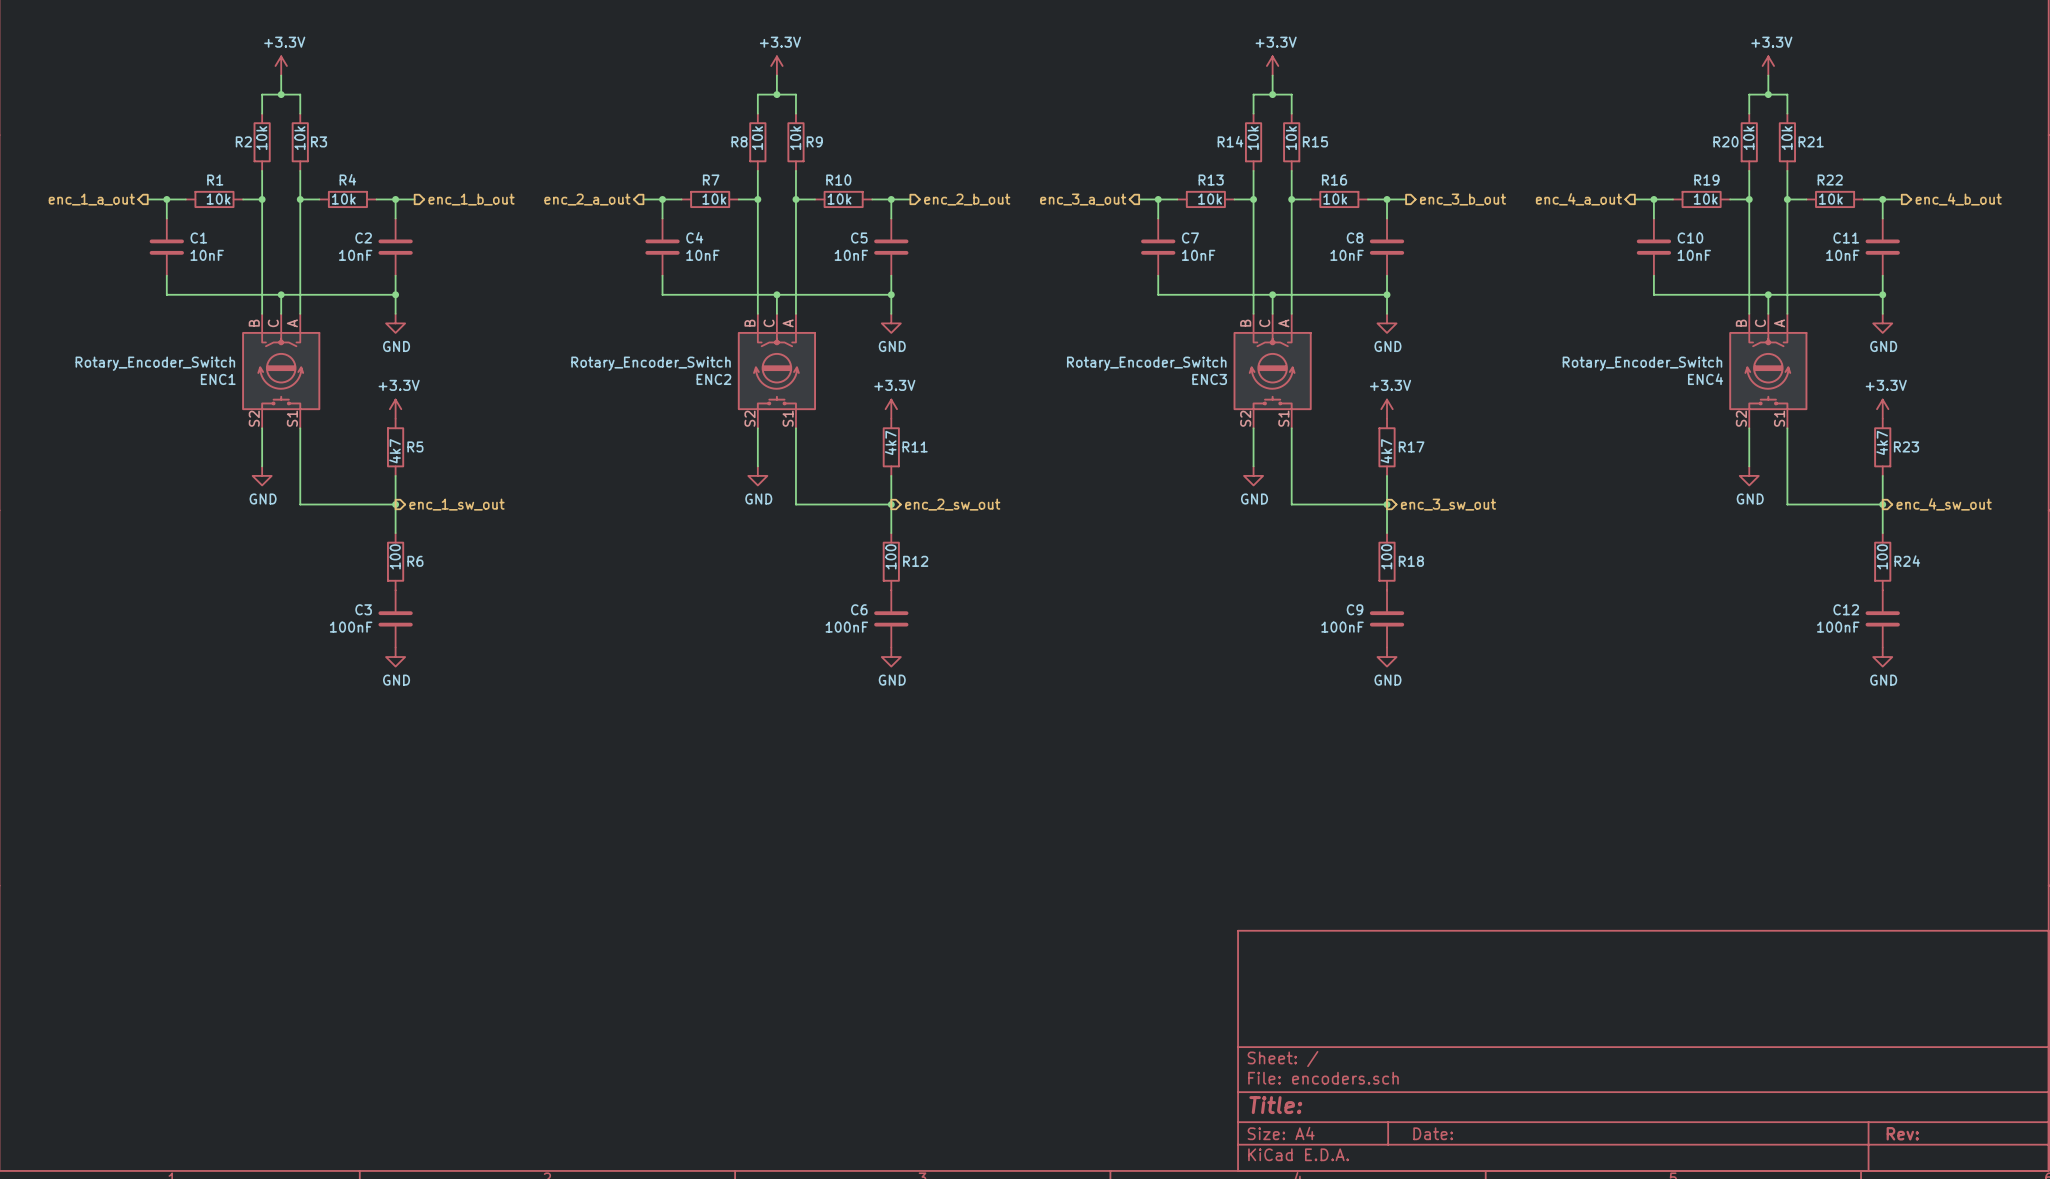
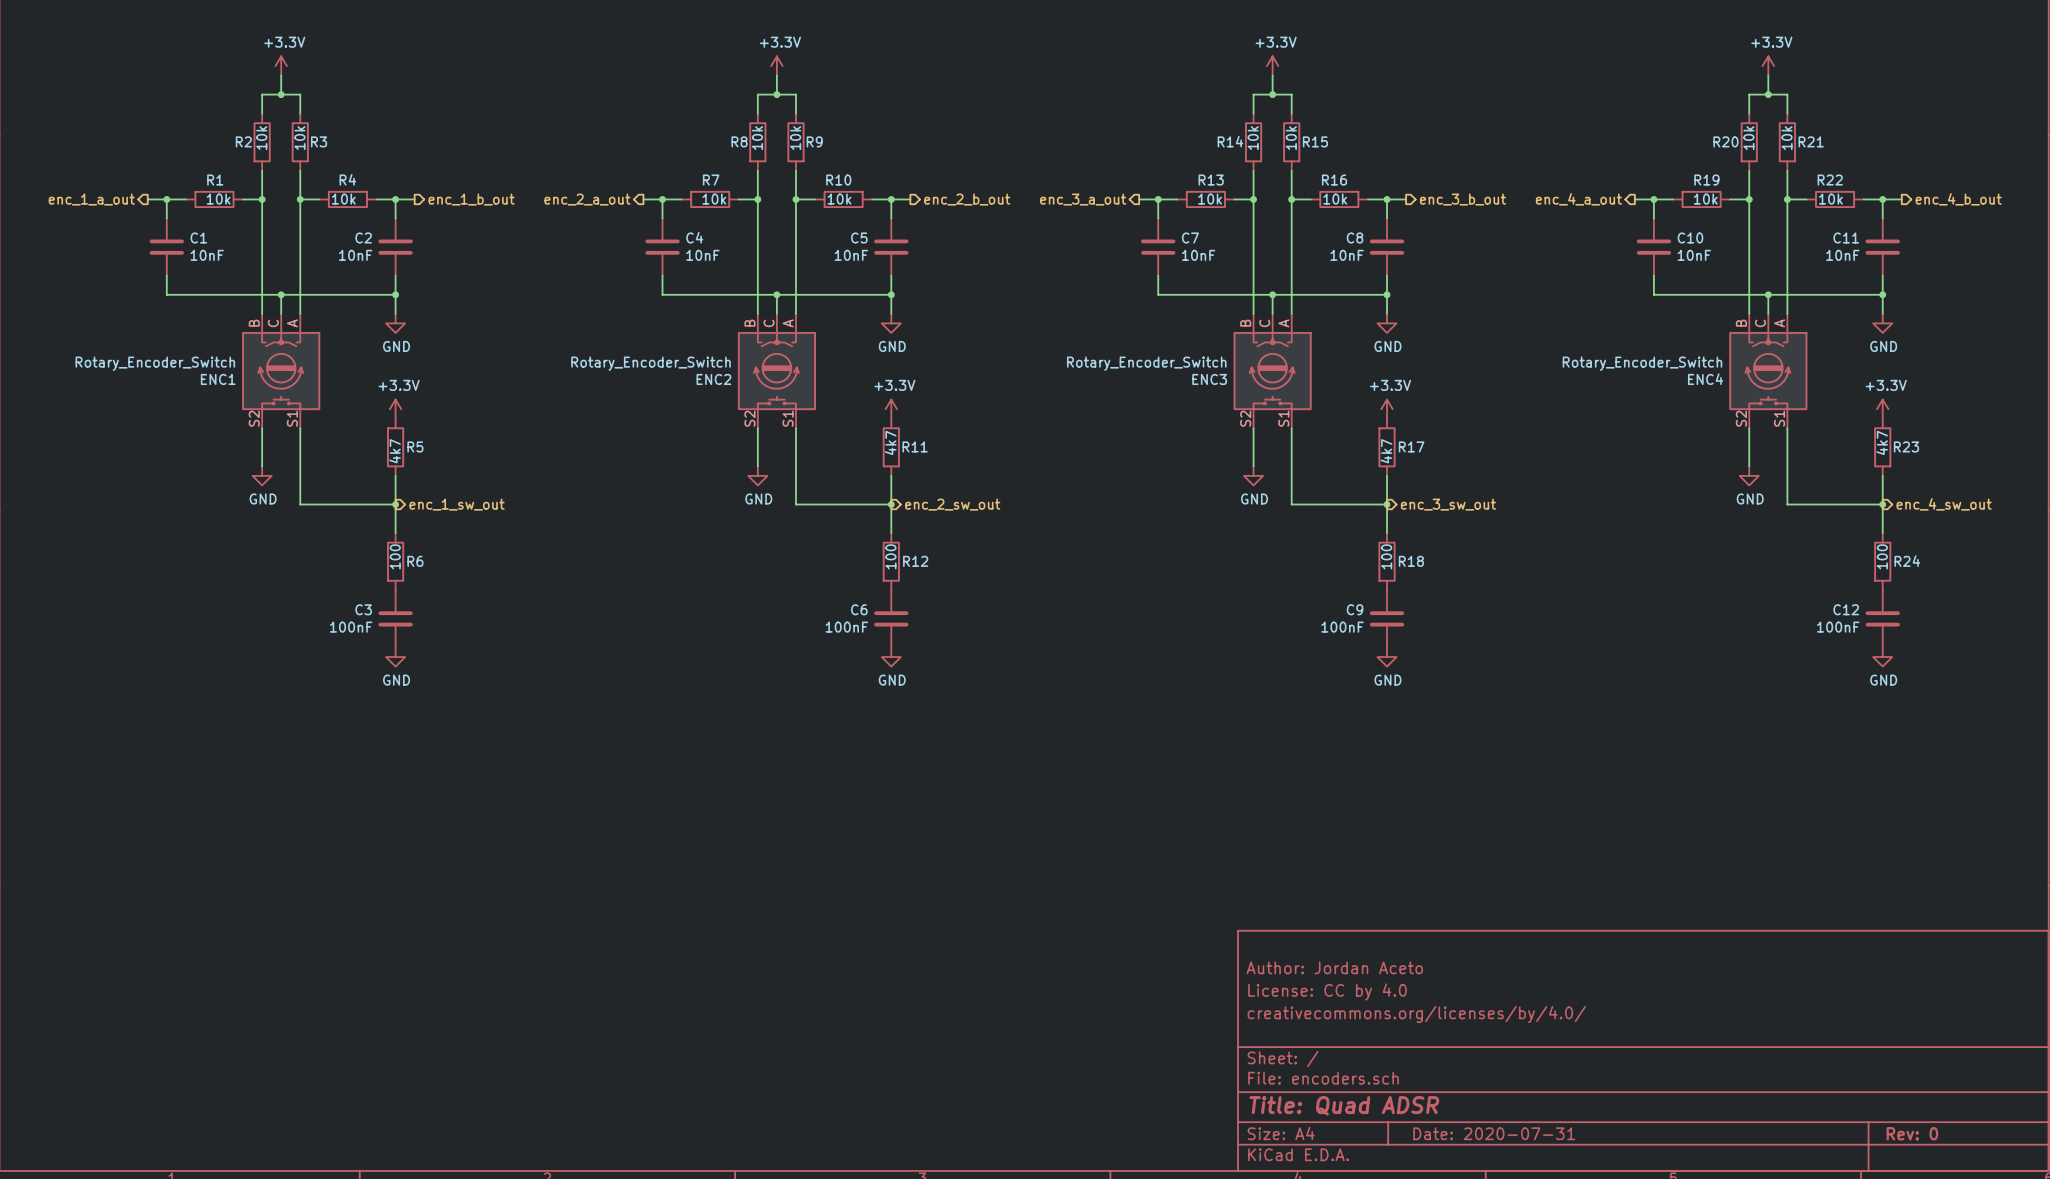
title block: none -> Author: Jordan Aceto (1334, 967)
title block: none -> License: CC by 4.0 (1327, 992)
title block: none -> creativecommons.org/licenses/by/4.0/ (1416, 1014)
title block: Title: (1275, 1105) -> Title: Quad ADSR (1344, 1105)
title block: Date: (1433, 1133) -> Date: 2020-07-31 (1494, 1133)
title block: Rev: (1902, 1133) -> Rev: 0 (1912, 1133)

